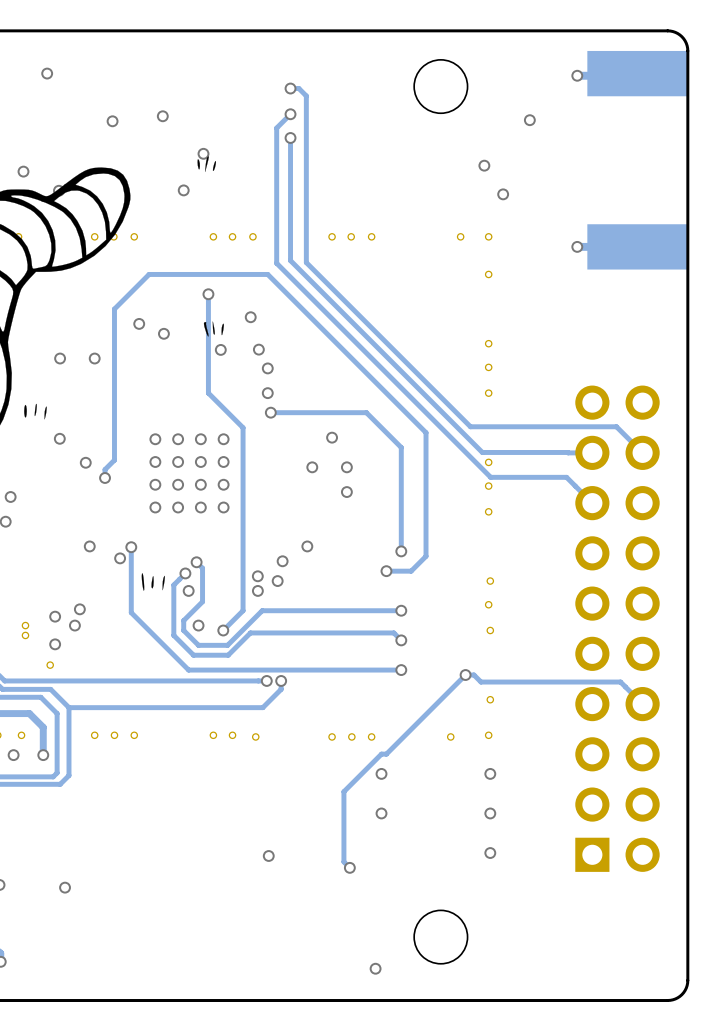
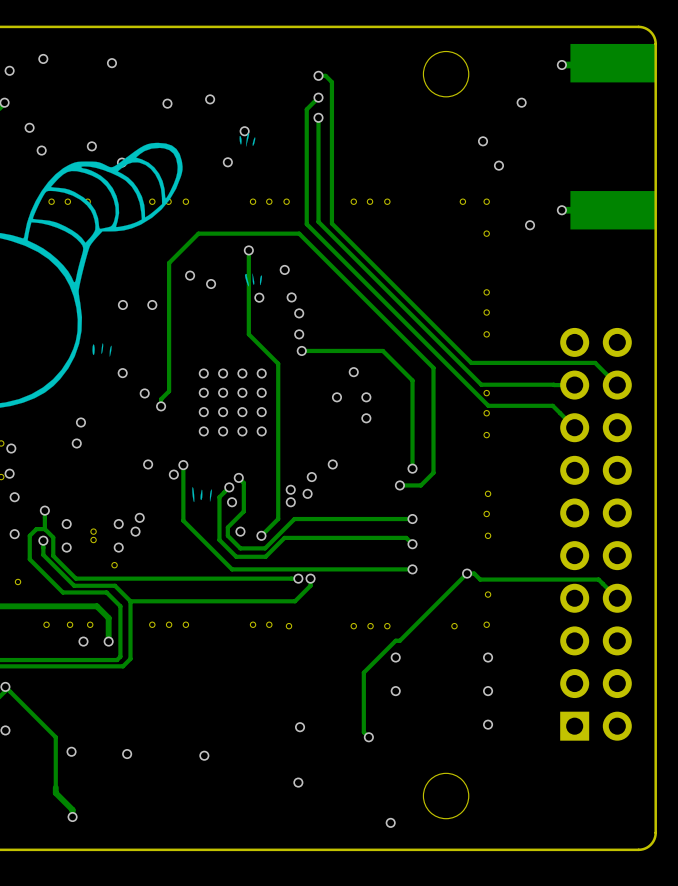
via: none -> (530, 225)
via: none -> (204, 755)
via: none -> (298, 782)

